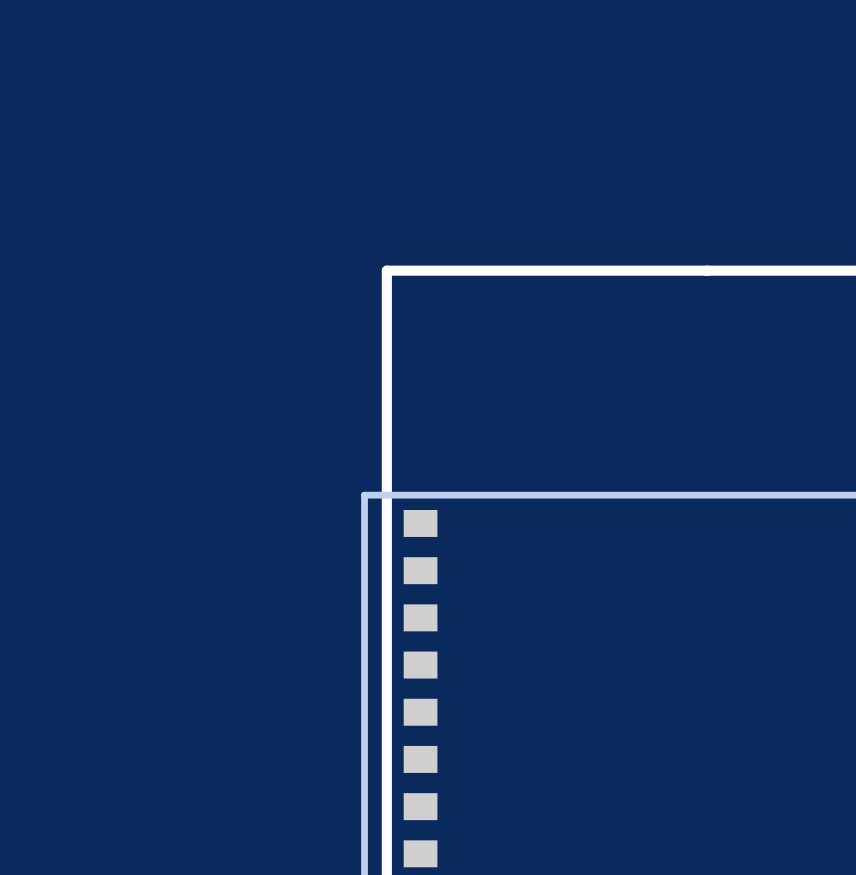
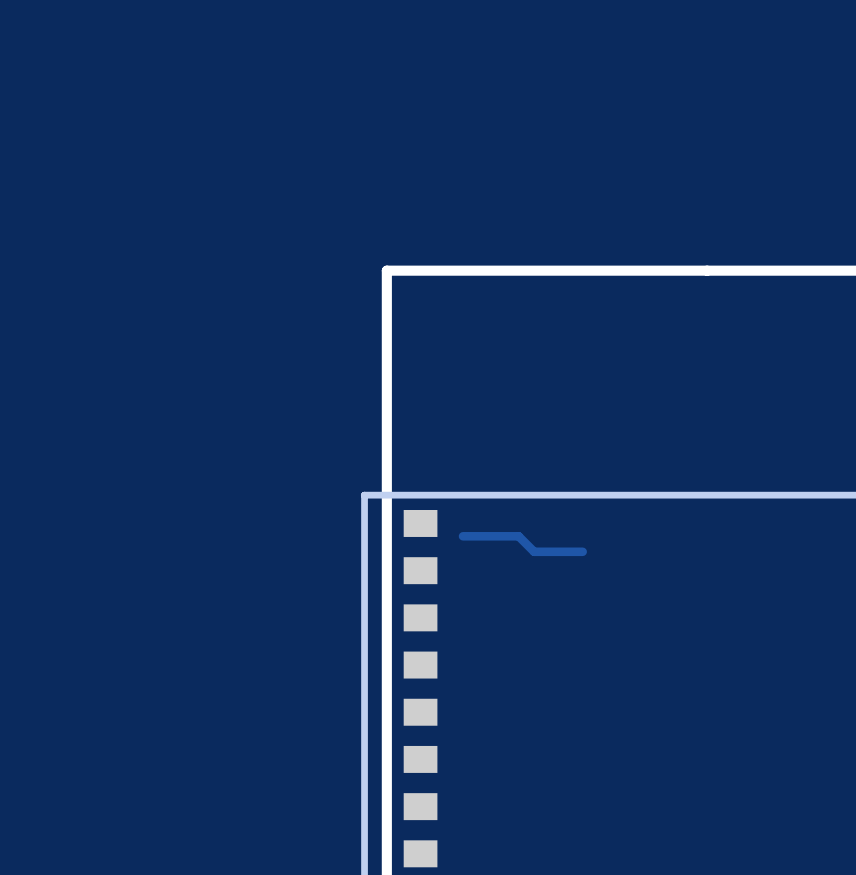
track: none -> (463, 536) (518, 536) (534, 551) (582, 551)

